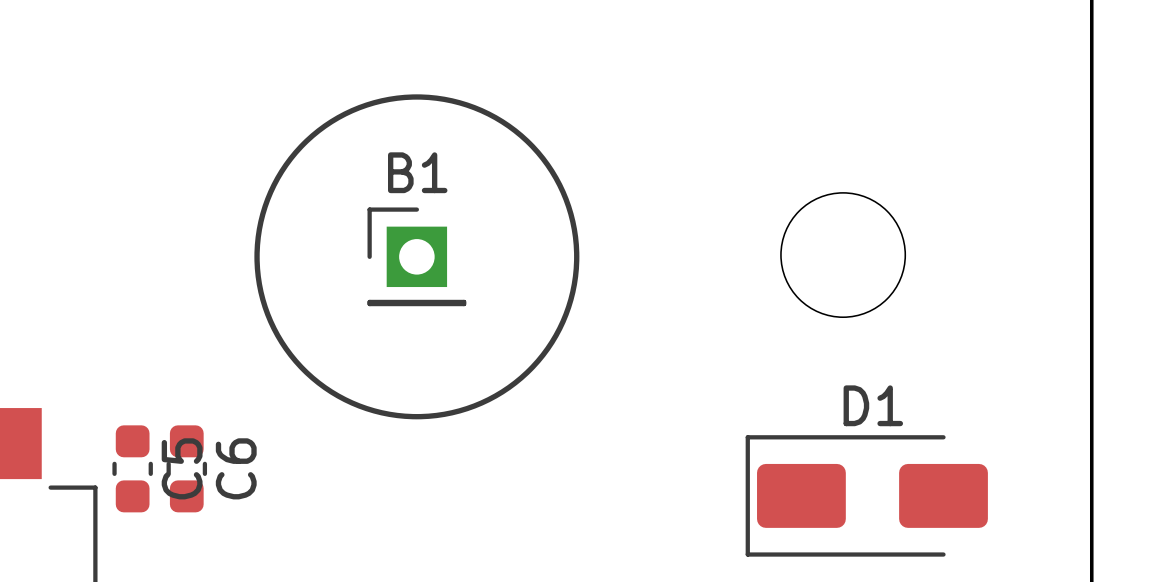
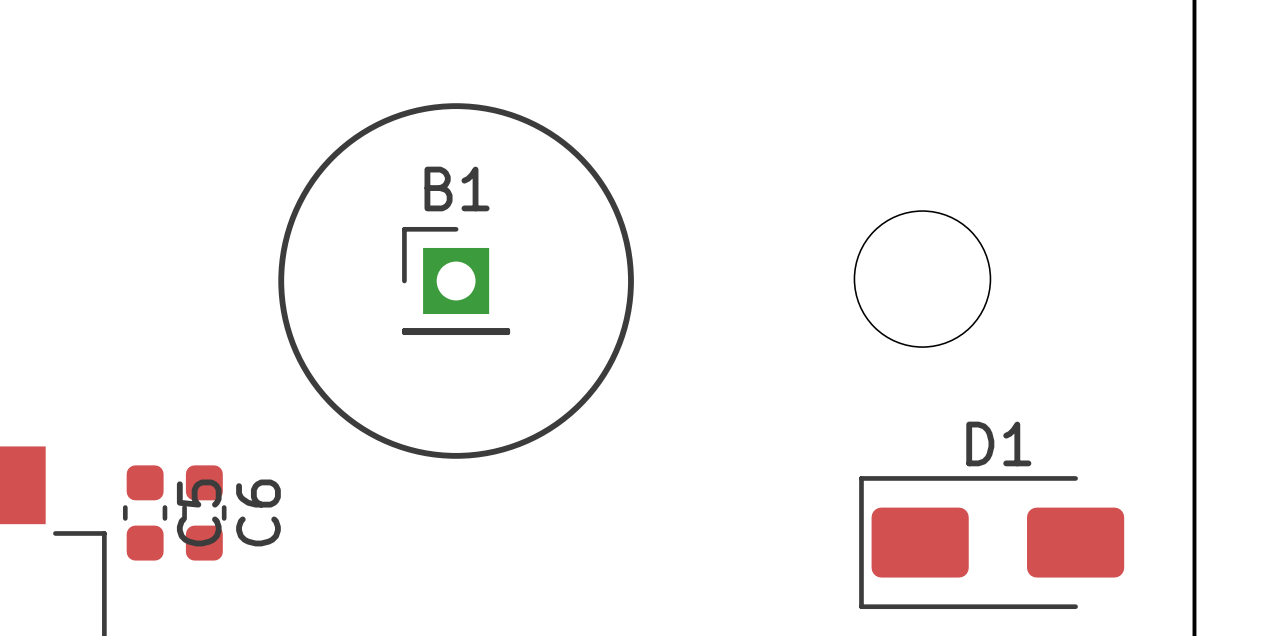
D1 position: (866, 495) -> (991, 542)

